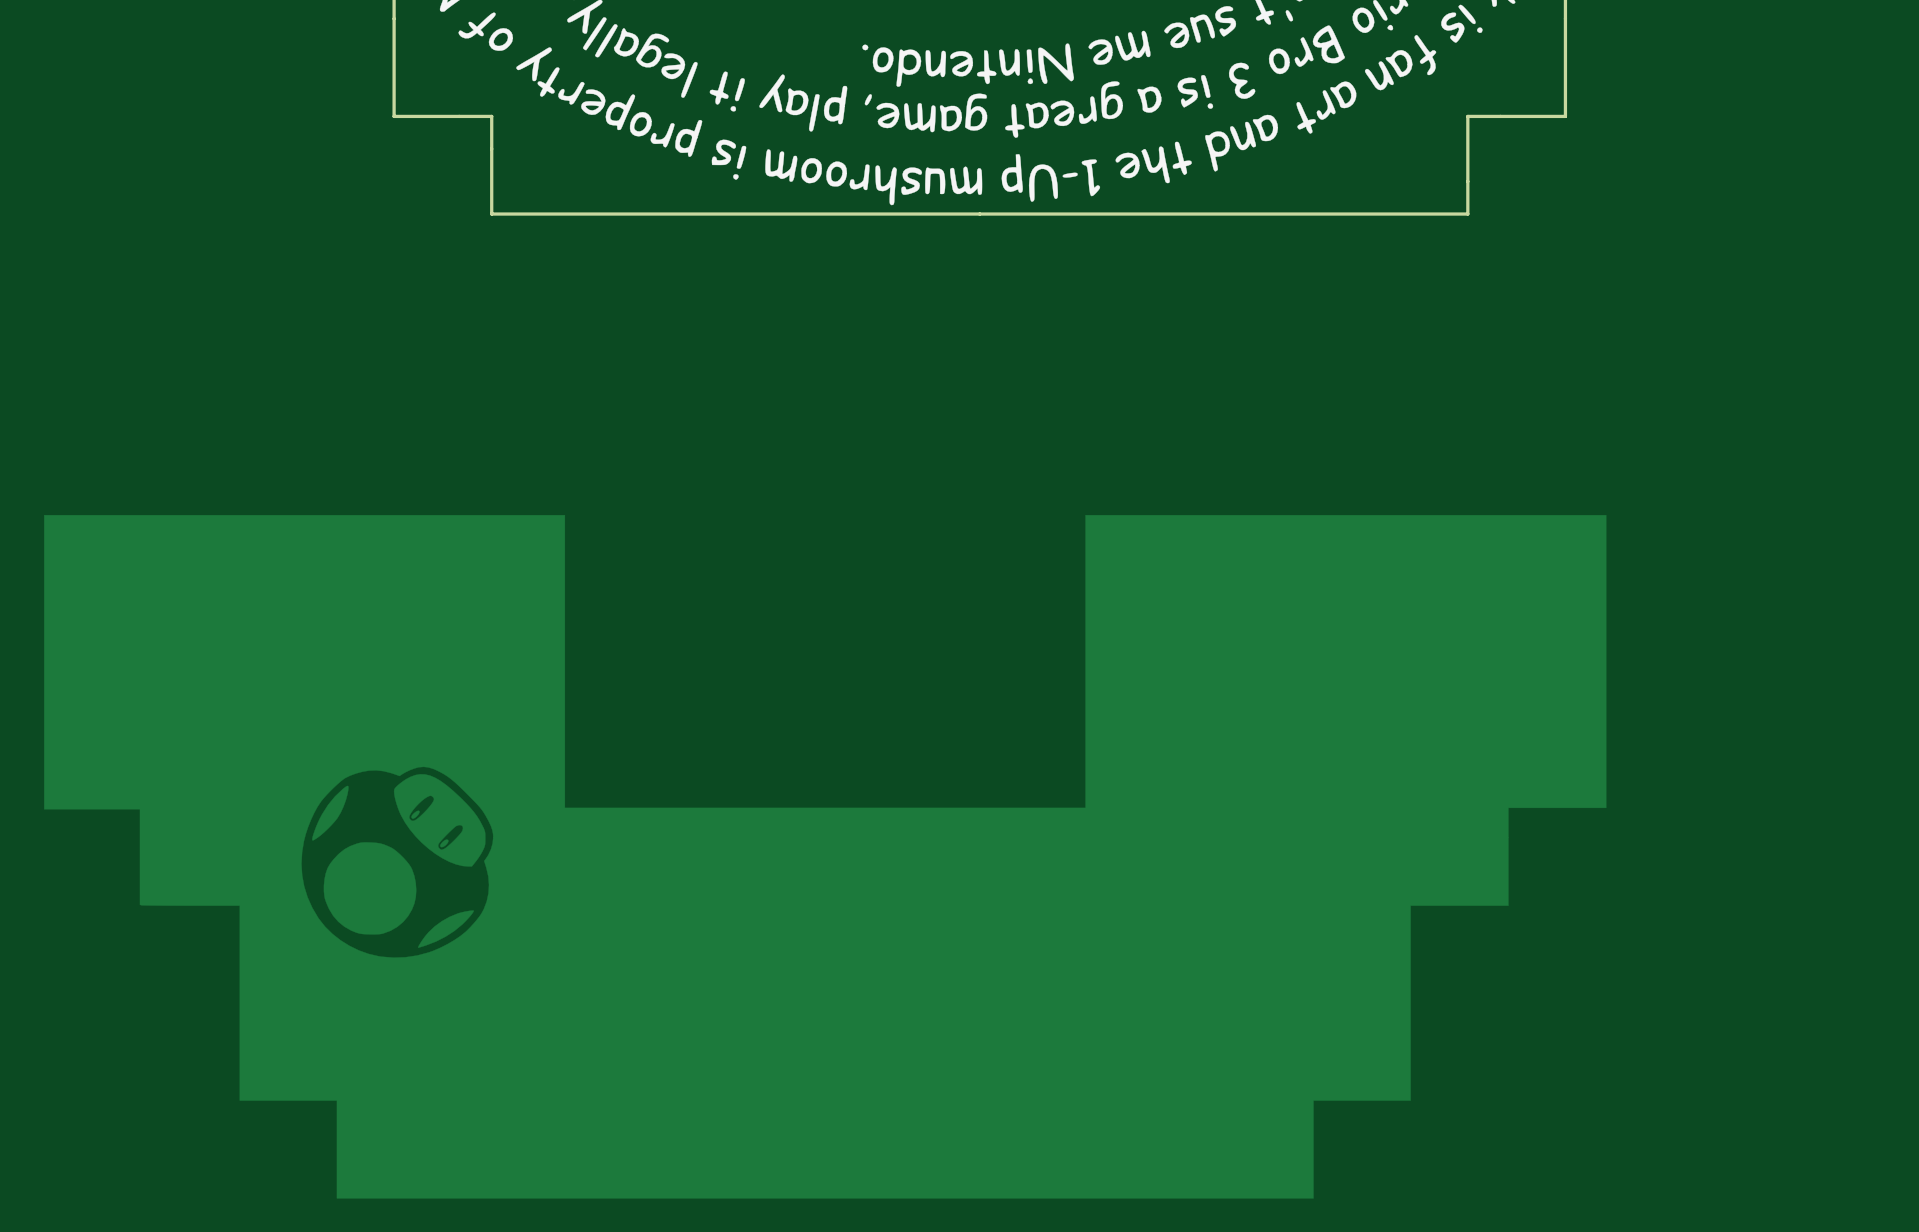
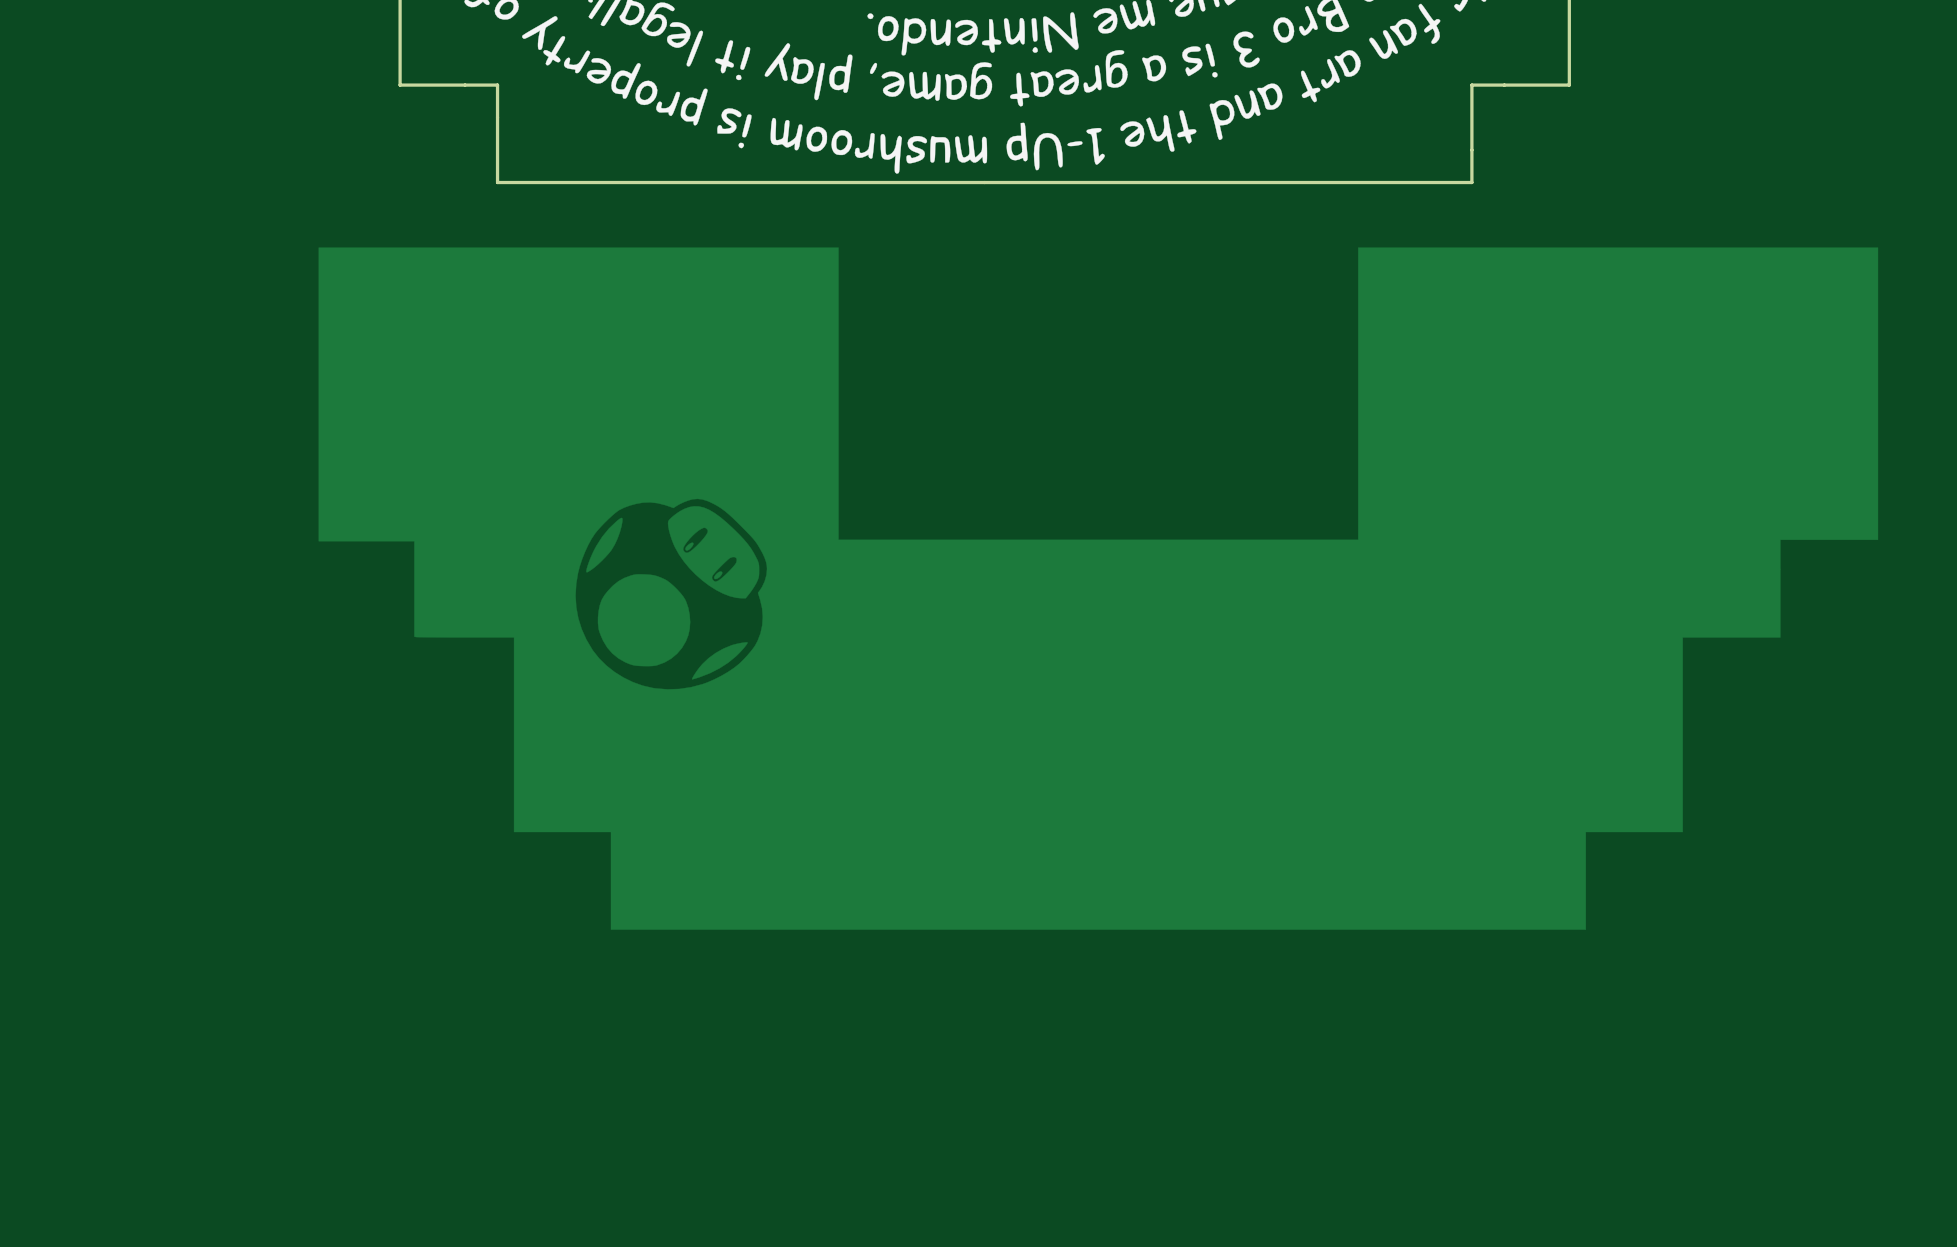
drawing position: (825, 856) -> (1098, 588)

